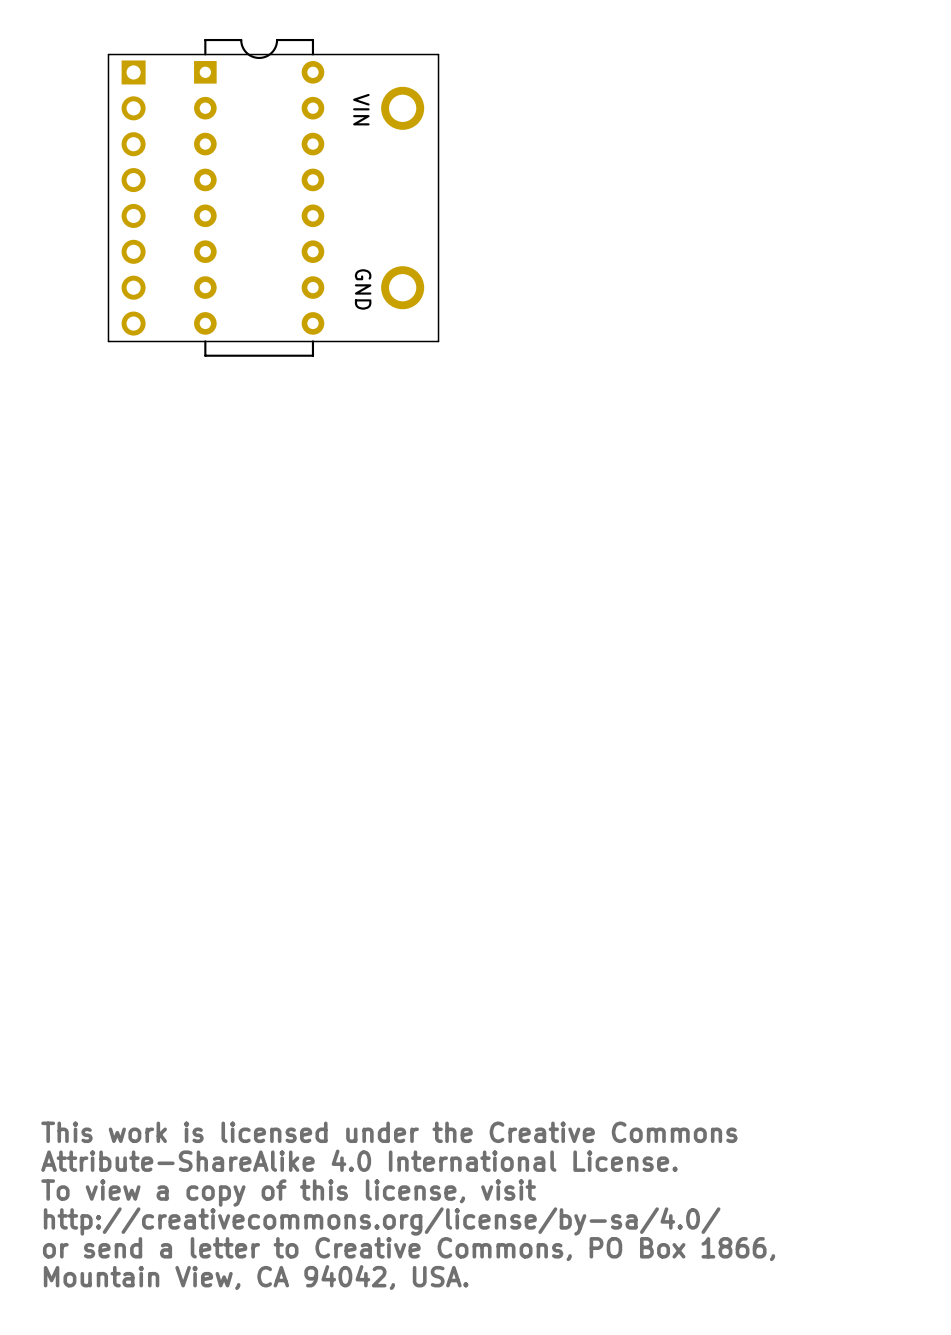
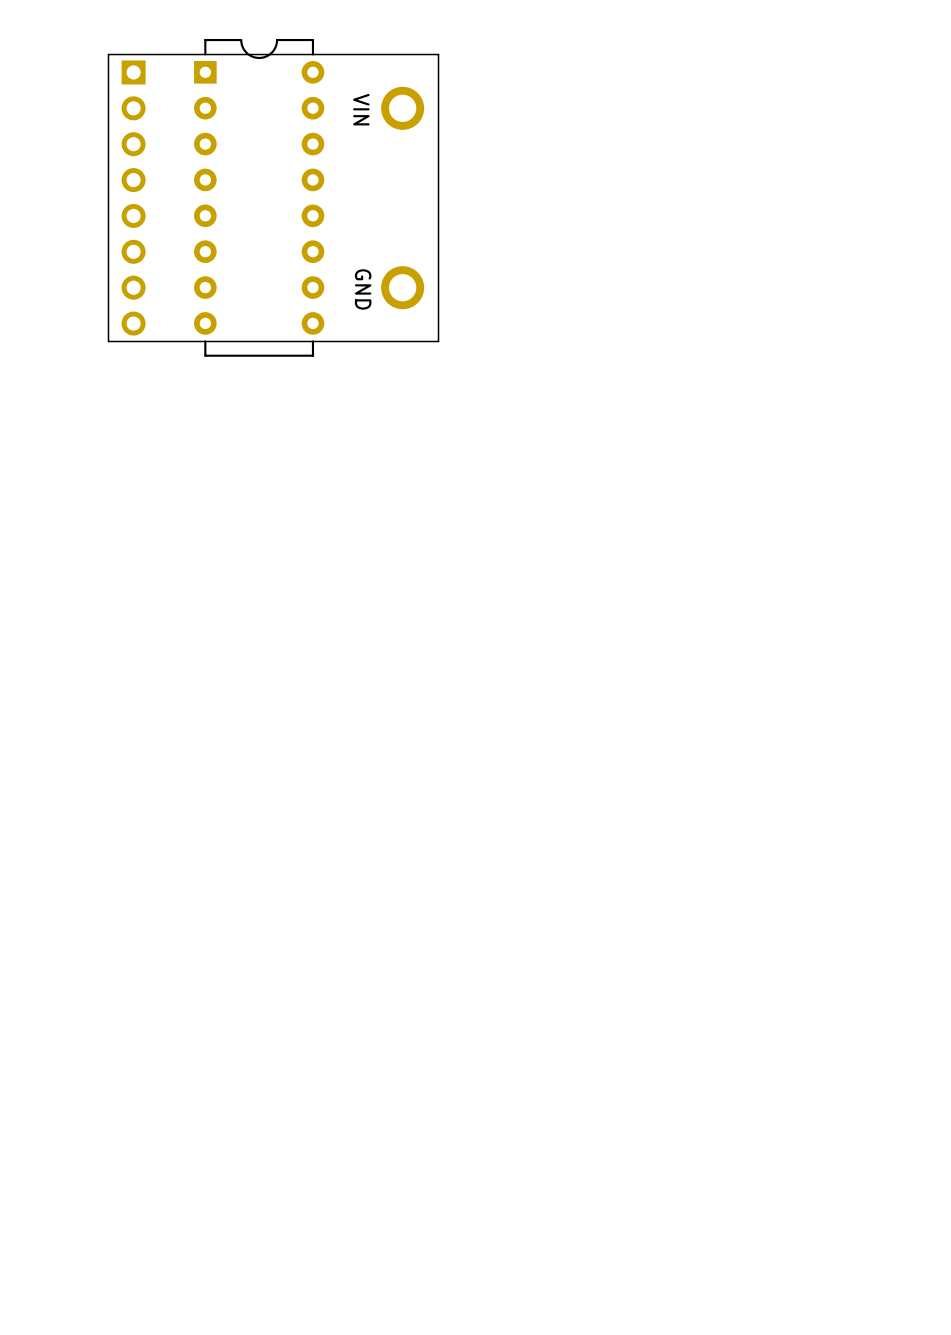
text: This work is licensed under the Creative Commons (389, 1132) -> none
text: Attribute-ShareAlike 4.0 International License. (359, 1160) -> none
text: To view a copy of this license, visit (288, 1193) -> none
text: http://creativecommons.org/license/by-sa/4.0/ (382, 1221) -> none
text: or send a letter to Creative Commons, PO Box 1866, (409, 1249) -> none
text: Mountain View, CA 94042, USA. (256, 1277) -> none

